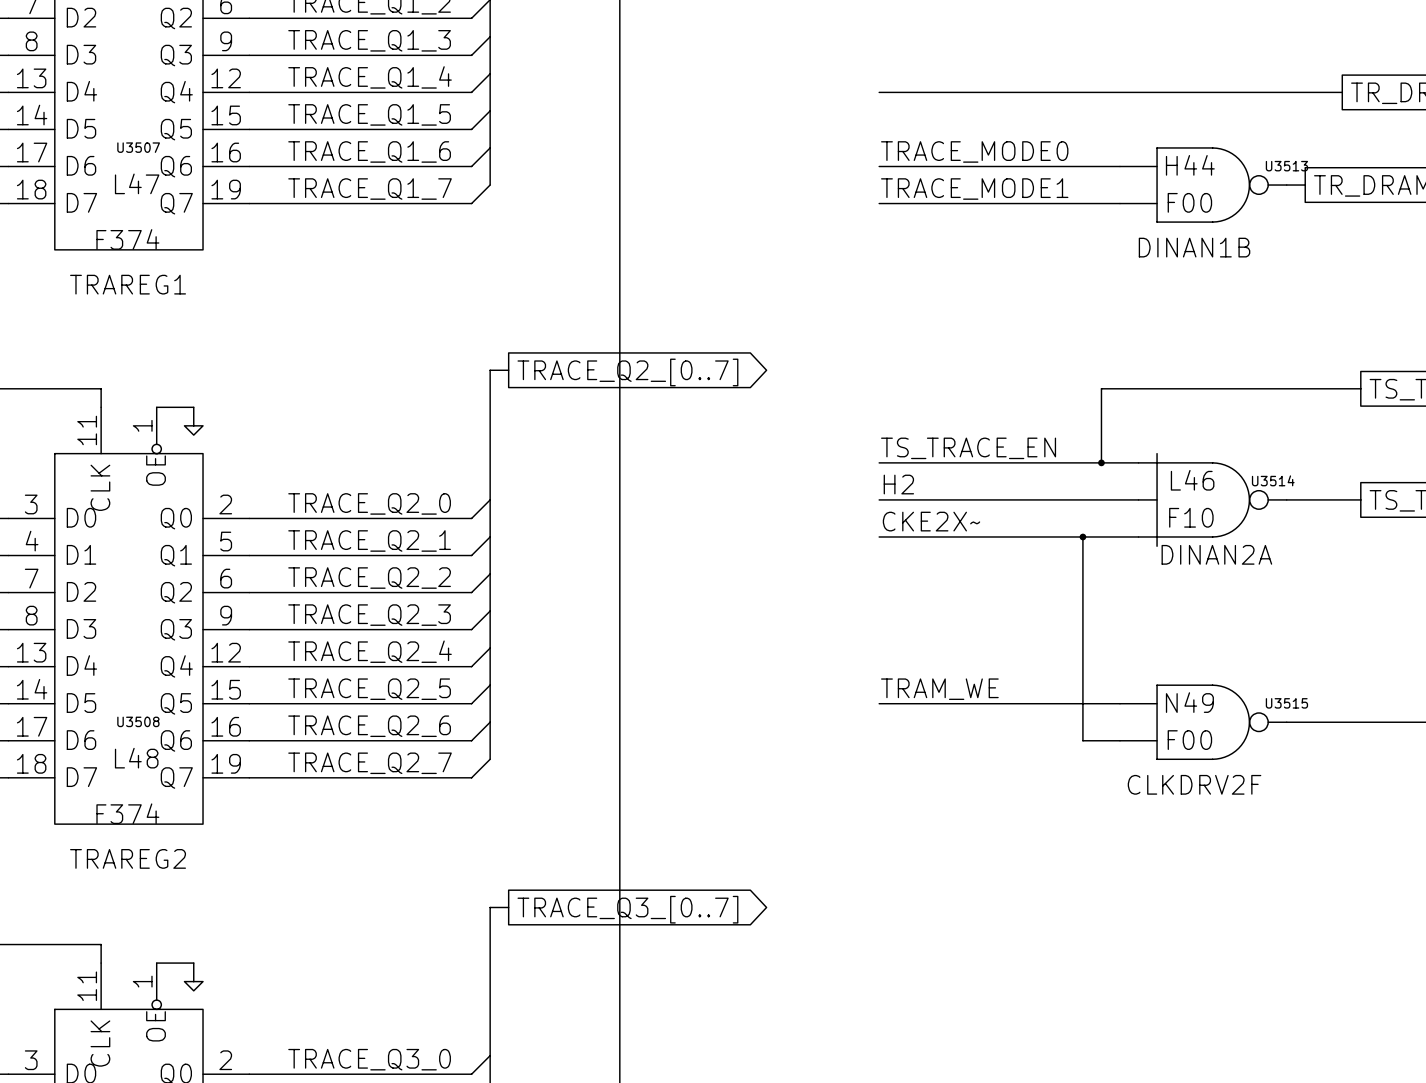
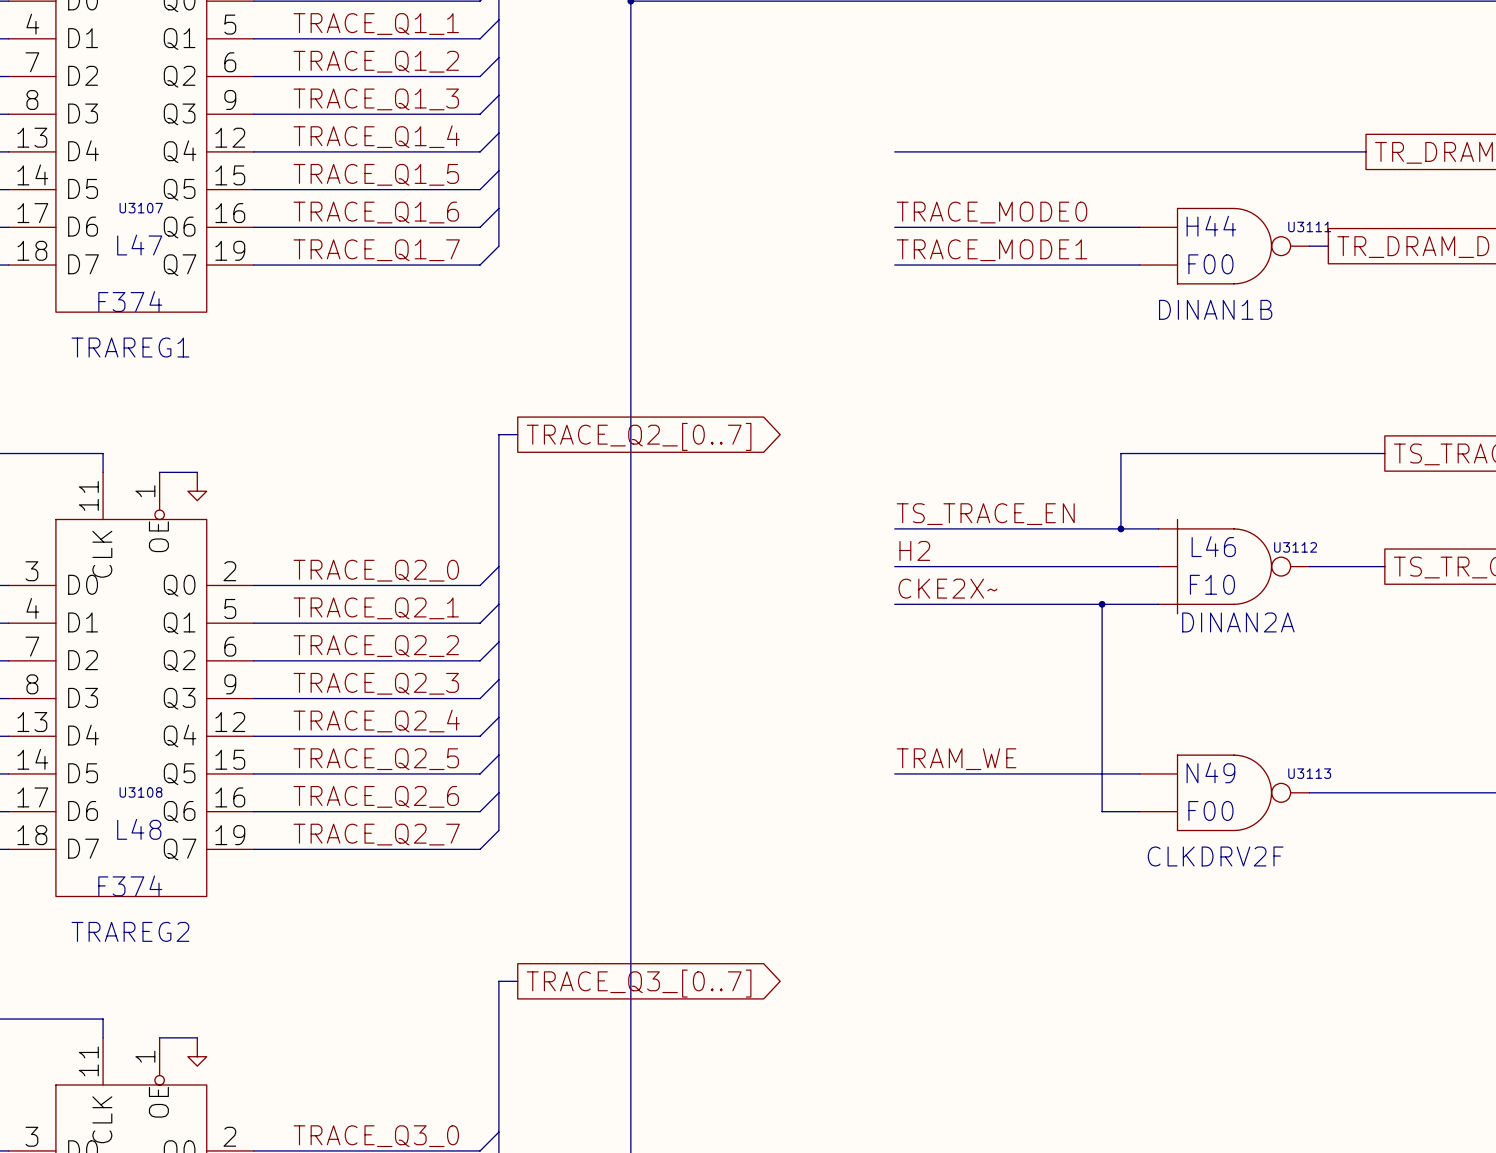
U3507 name: U3507 (138, 147) -> U3107 (141, 208)
U3513 name: U3513 (1286, 166) -> U3111 (1309, 226)
U3514 name: U3514 (1273, 480) -> U3112 (1295, 547)
U3515 name: U3515 (1286, 703) -> U3113 (1309, 773)
U3508 name: U3508 (138, 721) -> U3108 (140, 792)

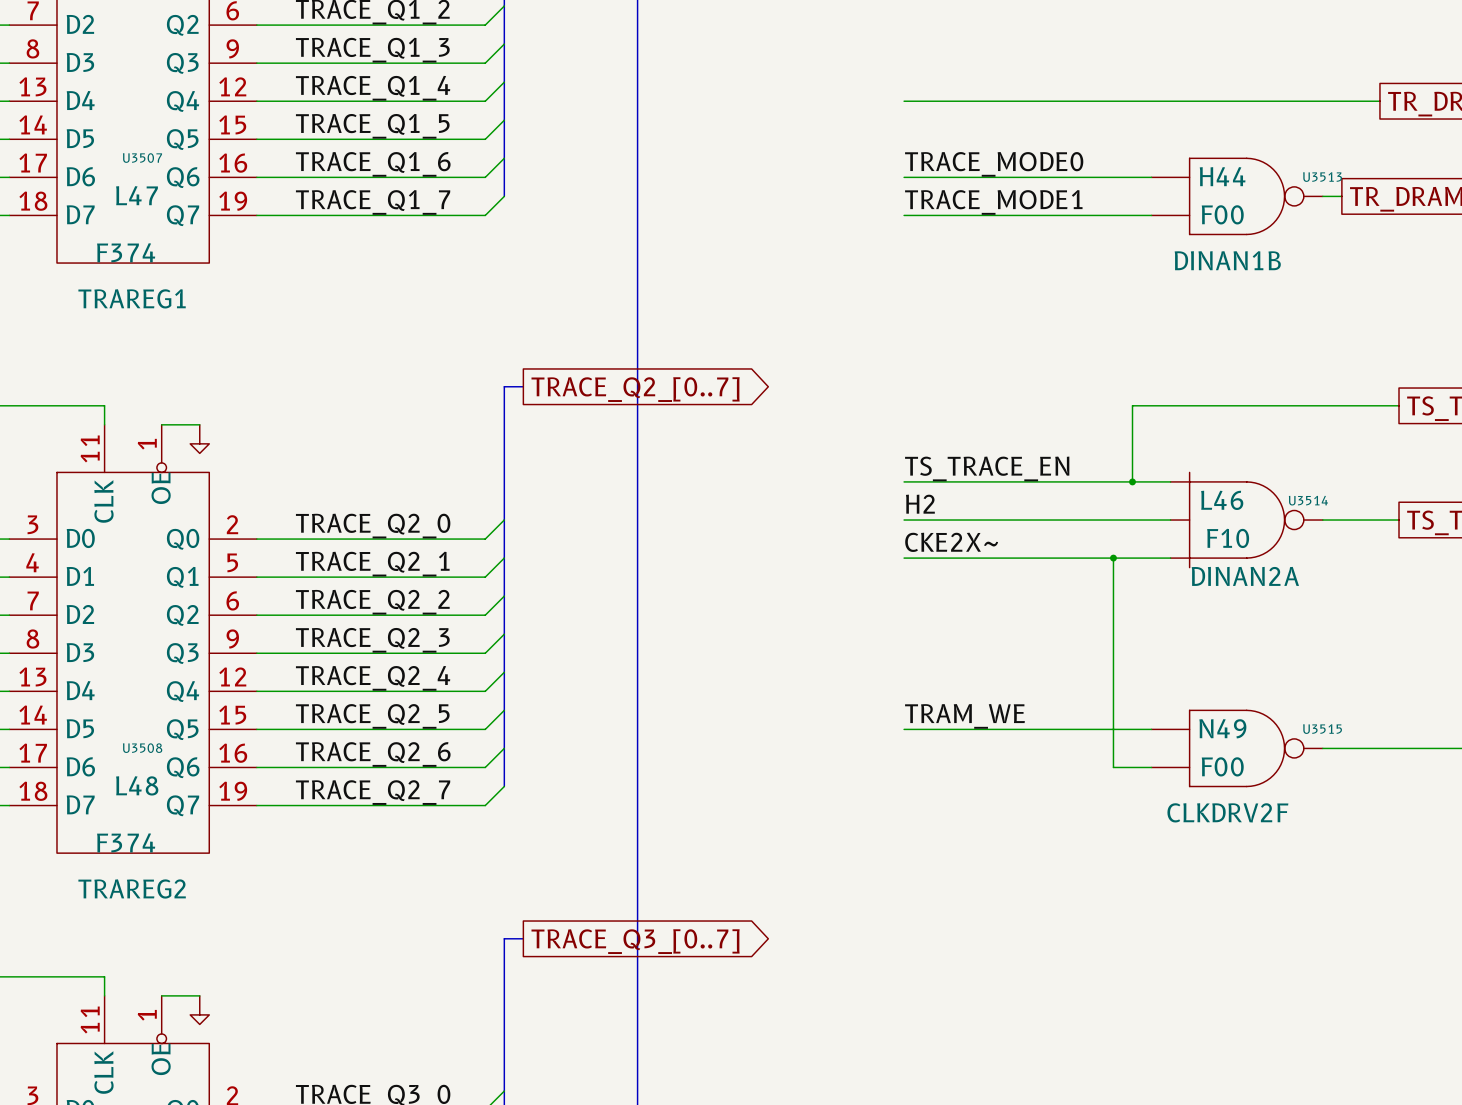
U3107 name: U3107 (141, 208) -> U3507 (142, 158)
U3111 name: U3111 (1309, 226) -> U3513 (1322, 177)
U3112 name: U3112 (1295, 547) -> U3514 (1308, 500)
U3113 name: U3113 (1309, 773) -> U3515 (1322, 729)
U3108 name: U3108 (140, 792) -> U3508 (142, 748)

